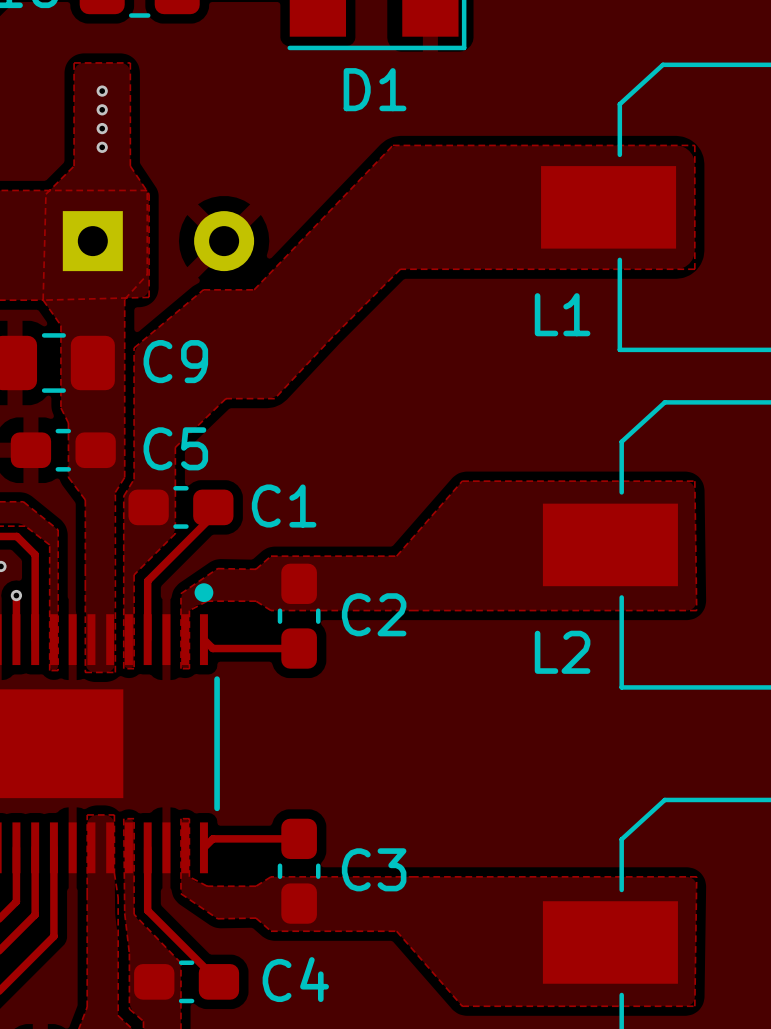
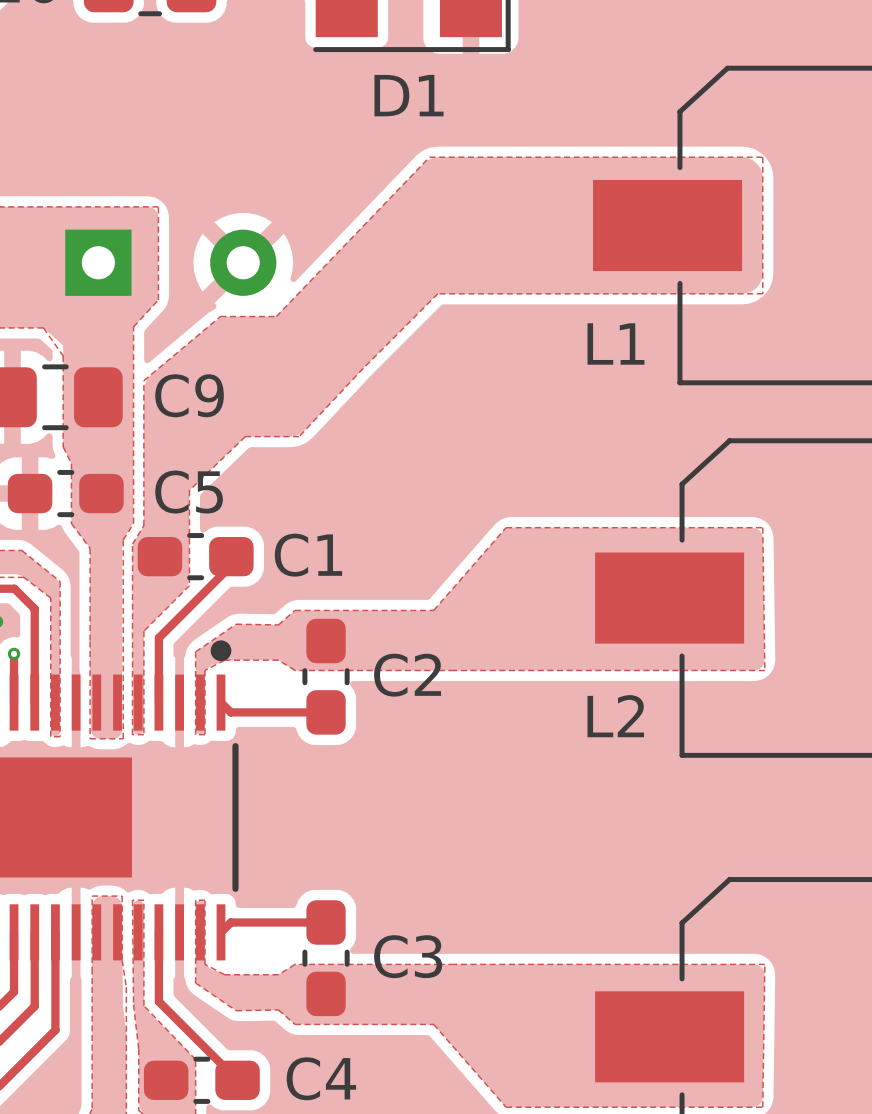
zone outline: (74, 62) (74, 166) (45, 194) (43, 300) (149, 297) (149, 194) (130, 166) (130, 62) (74, 62) -> none
via: (102, 91) -> none
via: (102, 109) -> none
via: (102, 128) -> none
via: (102, 147) -> none

